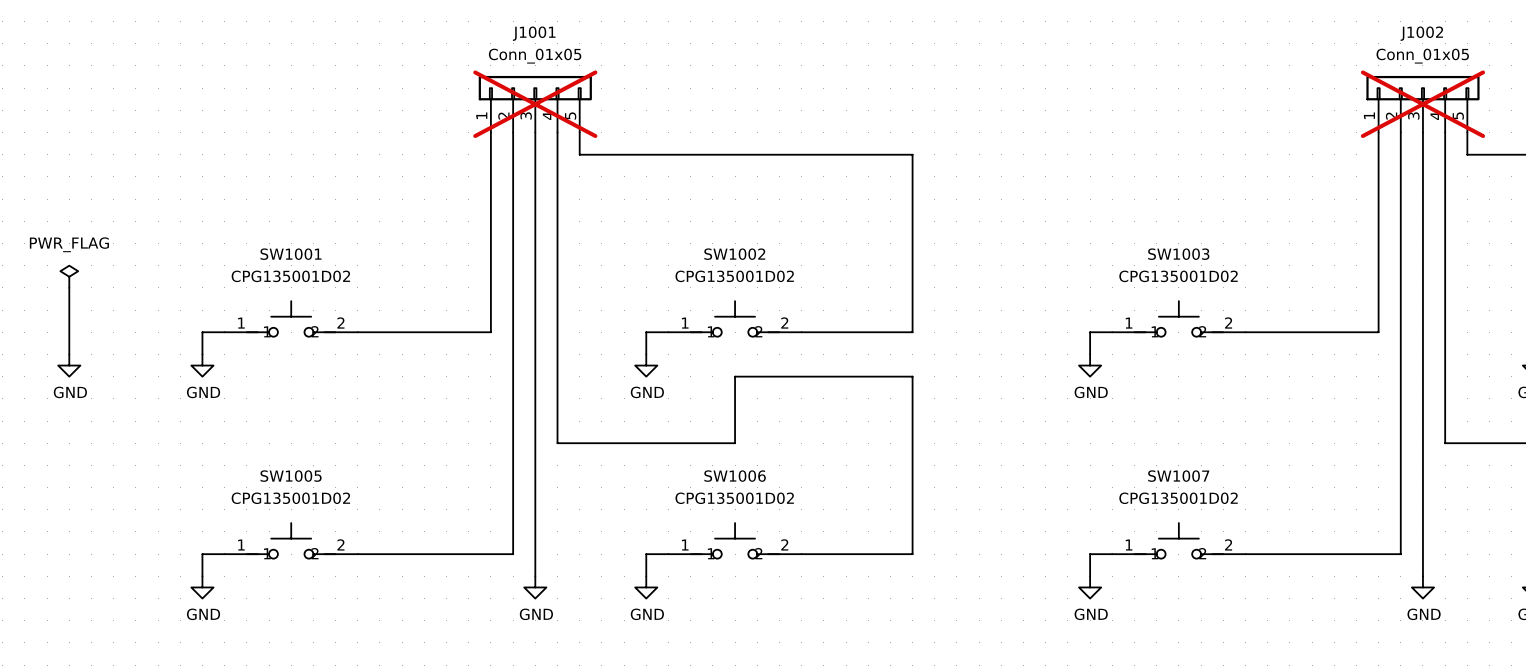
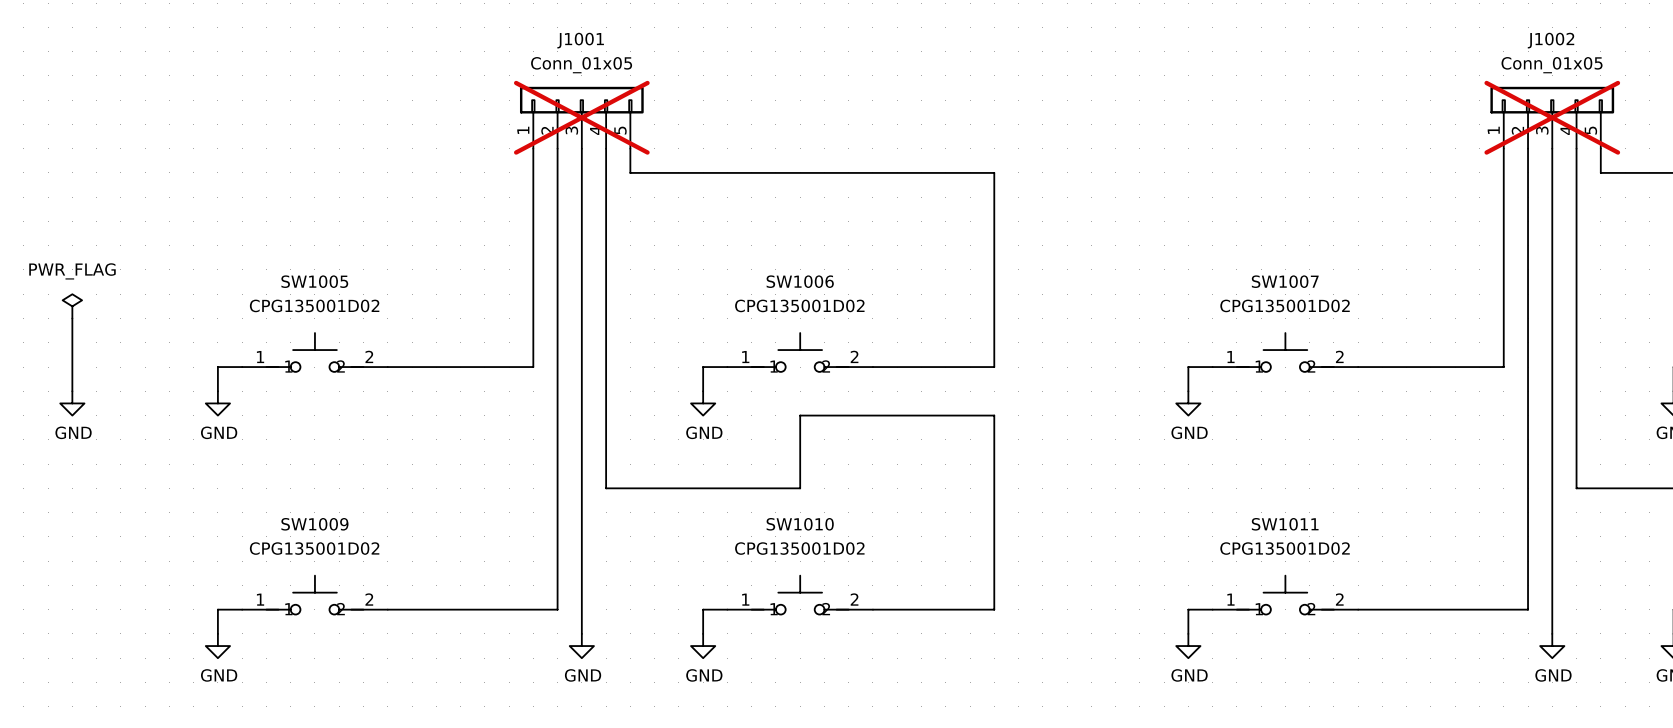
SW1001 name: SW1001 (291, 254) -> SW1005 (314, 281)
SW1002 name: SW1002 (734, 254) -> SW1006 (800, 281)
SW1003 name: SW1003 (1178, 254) -> SW1007 (1285, 281)
SW1005 name: SW1005 (291, 476) -> SW1009 (314, 524)
SW1006 name: SW1006 (735, 476) -> SW1010 (800, 524)
SW1007 name: SW1007 (1178, 476) -> SW1011 (1285, 524)

